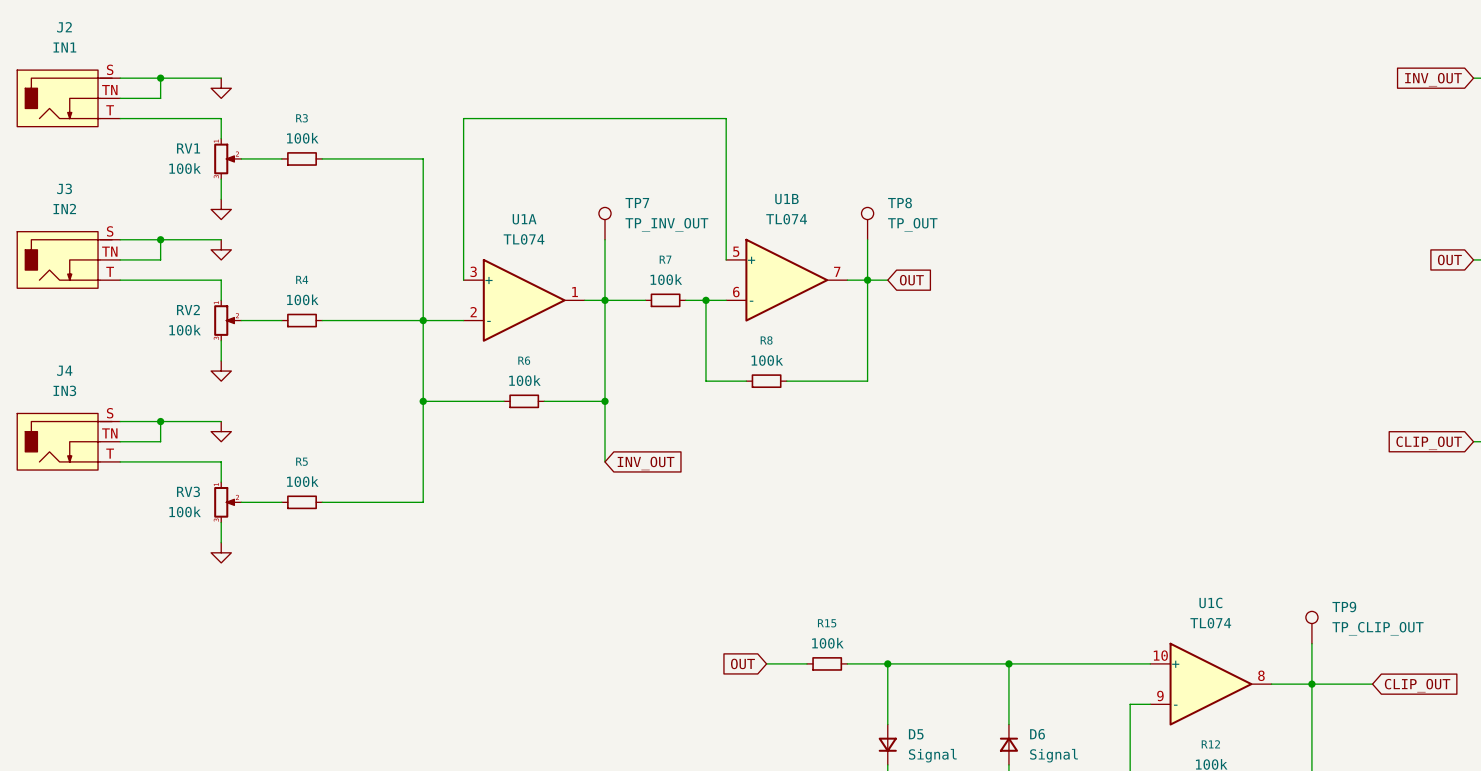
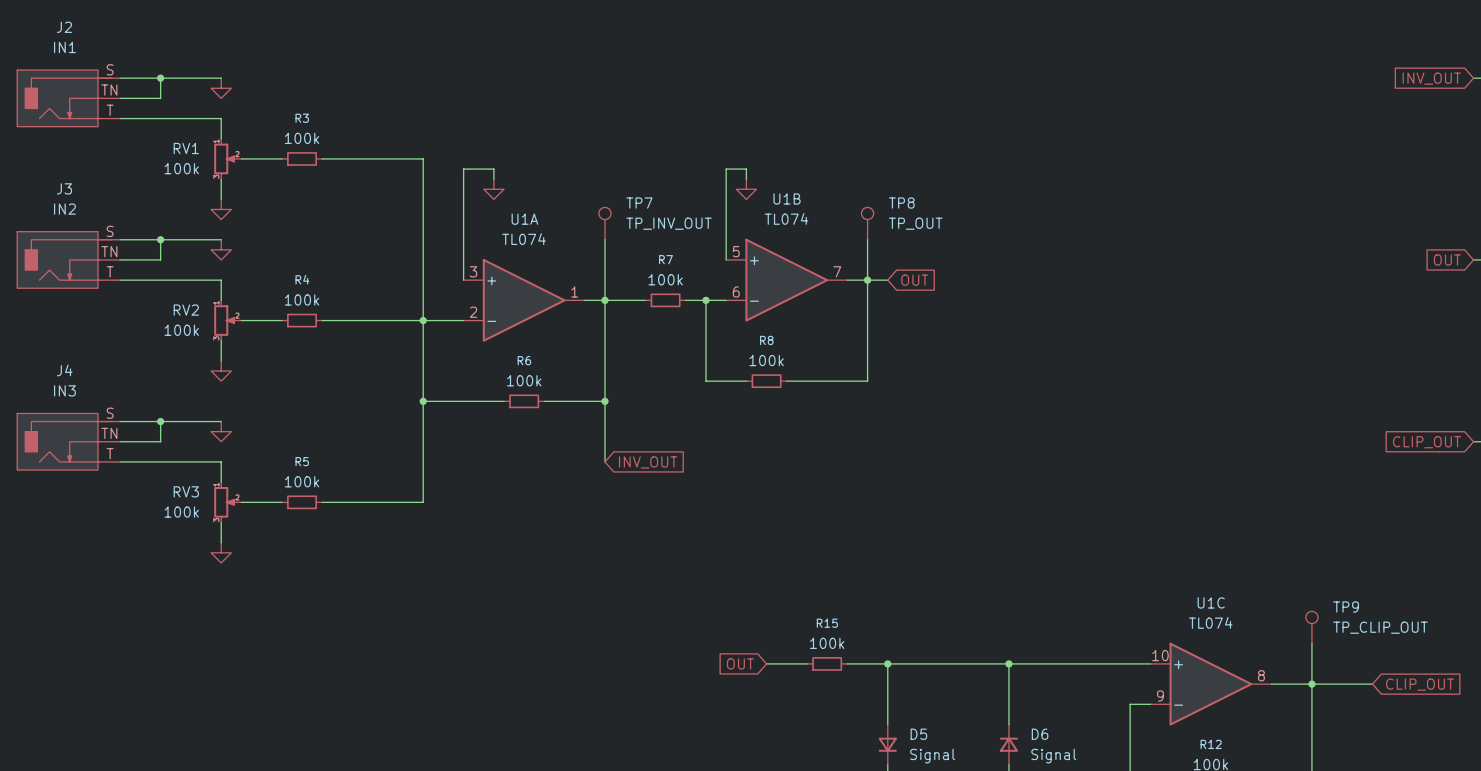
wire: (463, 169) (463, 118) (726, 118) (726, 169) -> (463, 169) (493, 169) (493, 179)
wire: none -> (726, 169) (746, 169) (746, 179)
power symbol: none -> (493, 189)
power symbol: none -> (746, 189)

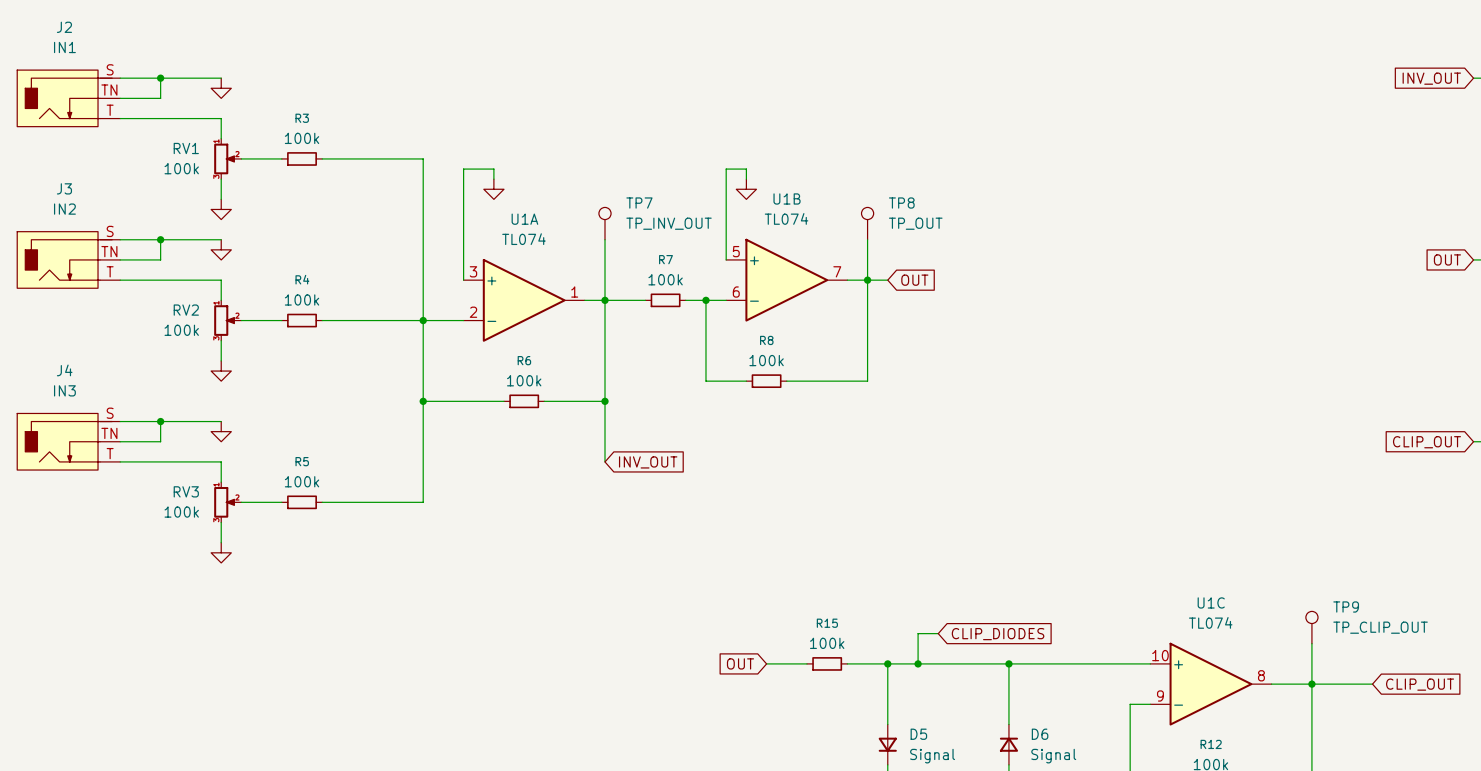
wire: none -> (938, 633) (918, 633) (918, 663)
global label: none -> CLIP_DIODES (998, 634)
junction: none -> (918, 663)

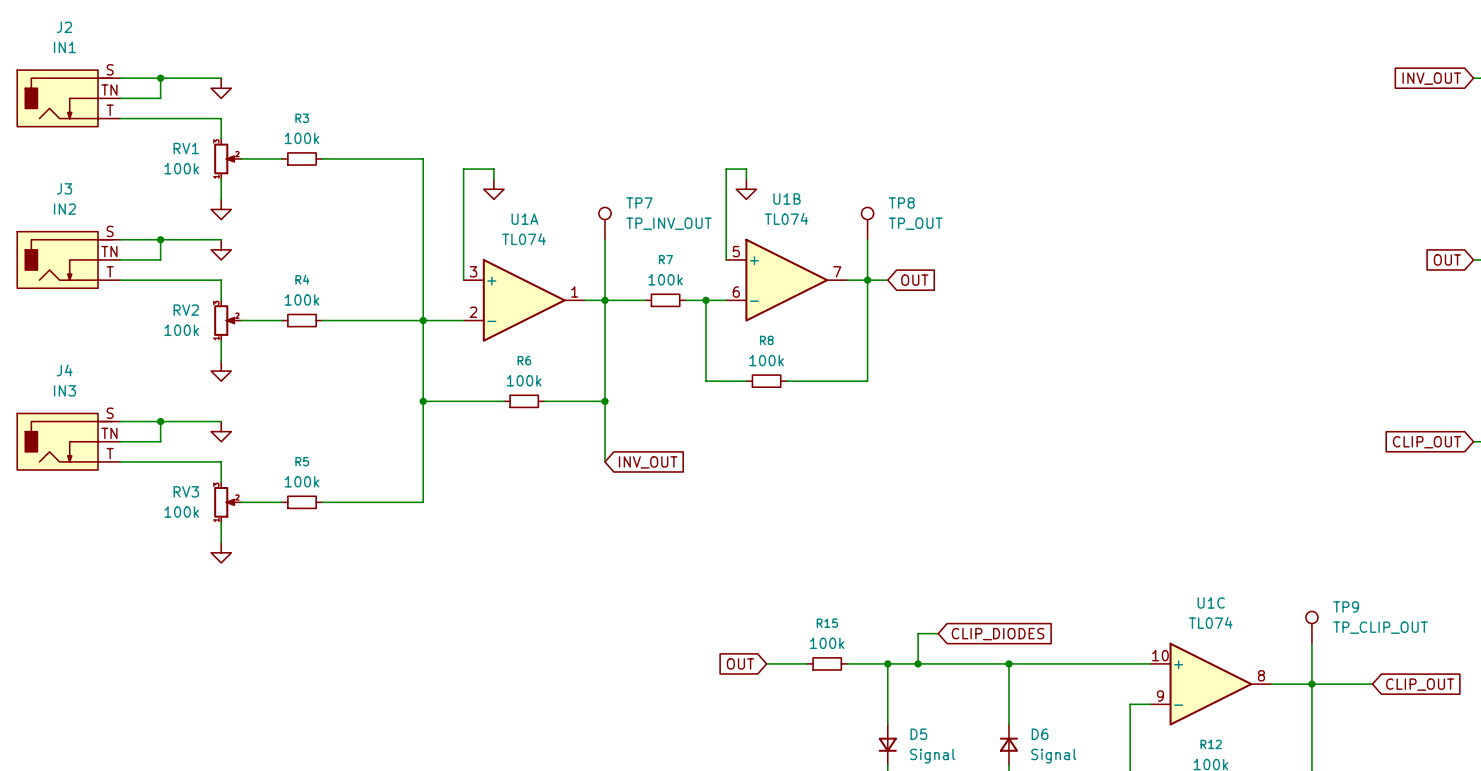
RV1 flip: as is (224, 158) -> up-down (224, 158)
RV2 flip: as is (224, 320) -> up-down (224, 320)
RV3 flip: as is (224, 502) -> up-down (224, 502)

